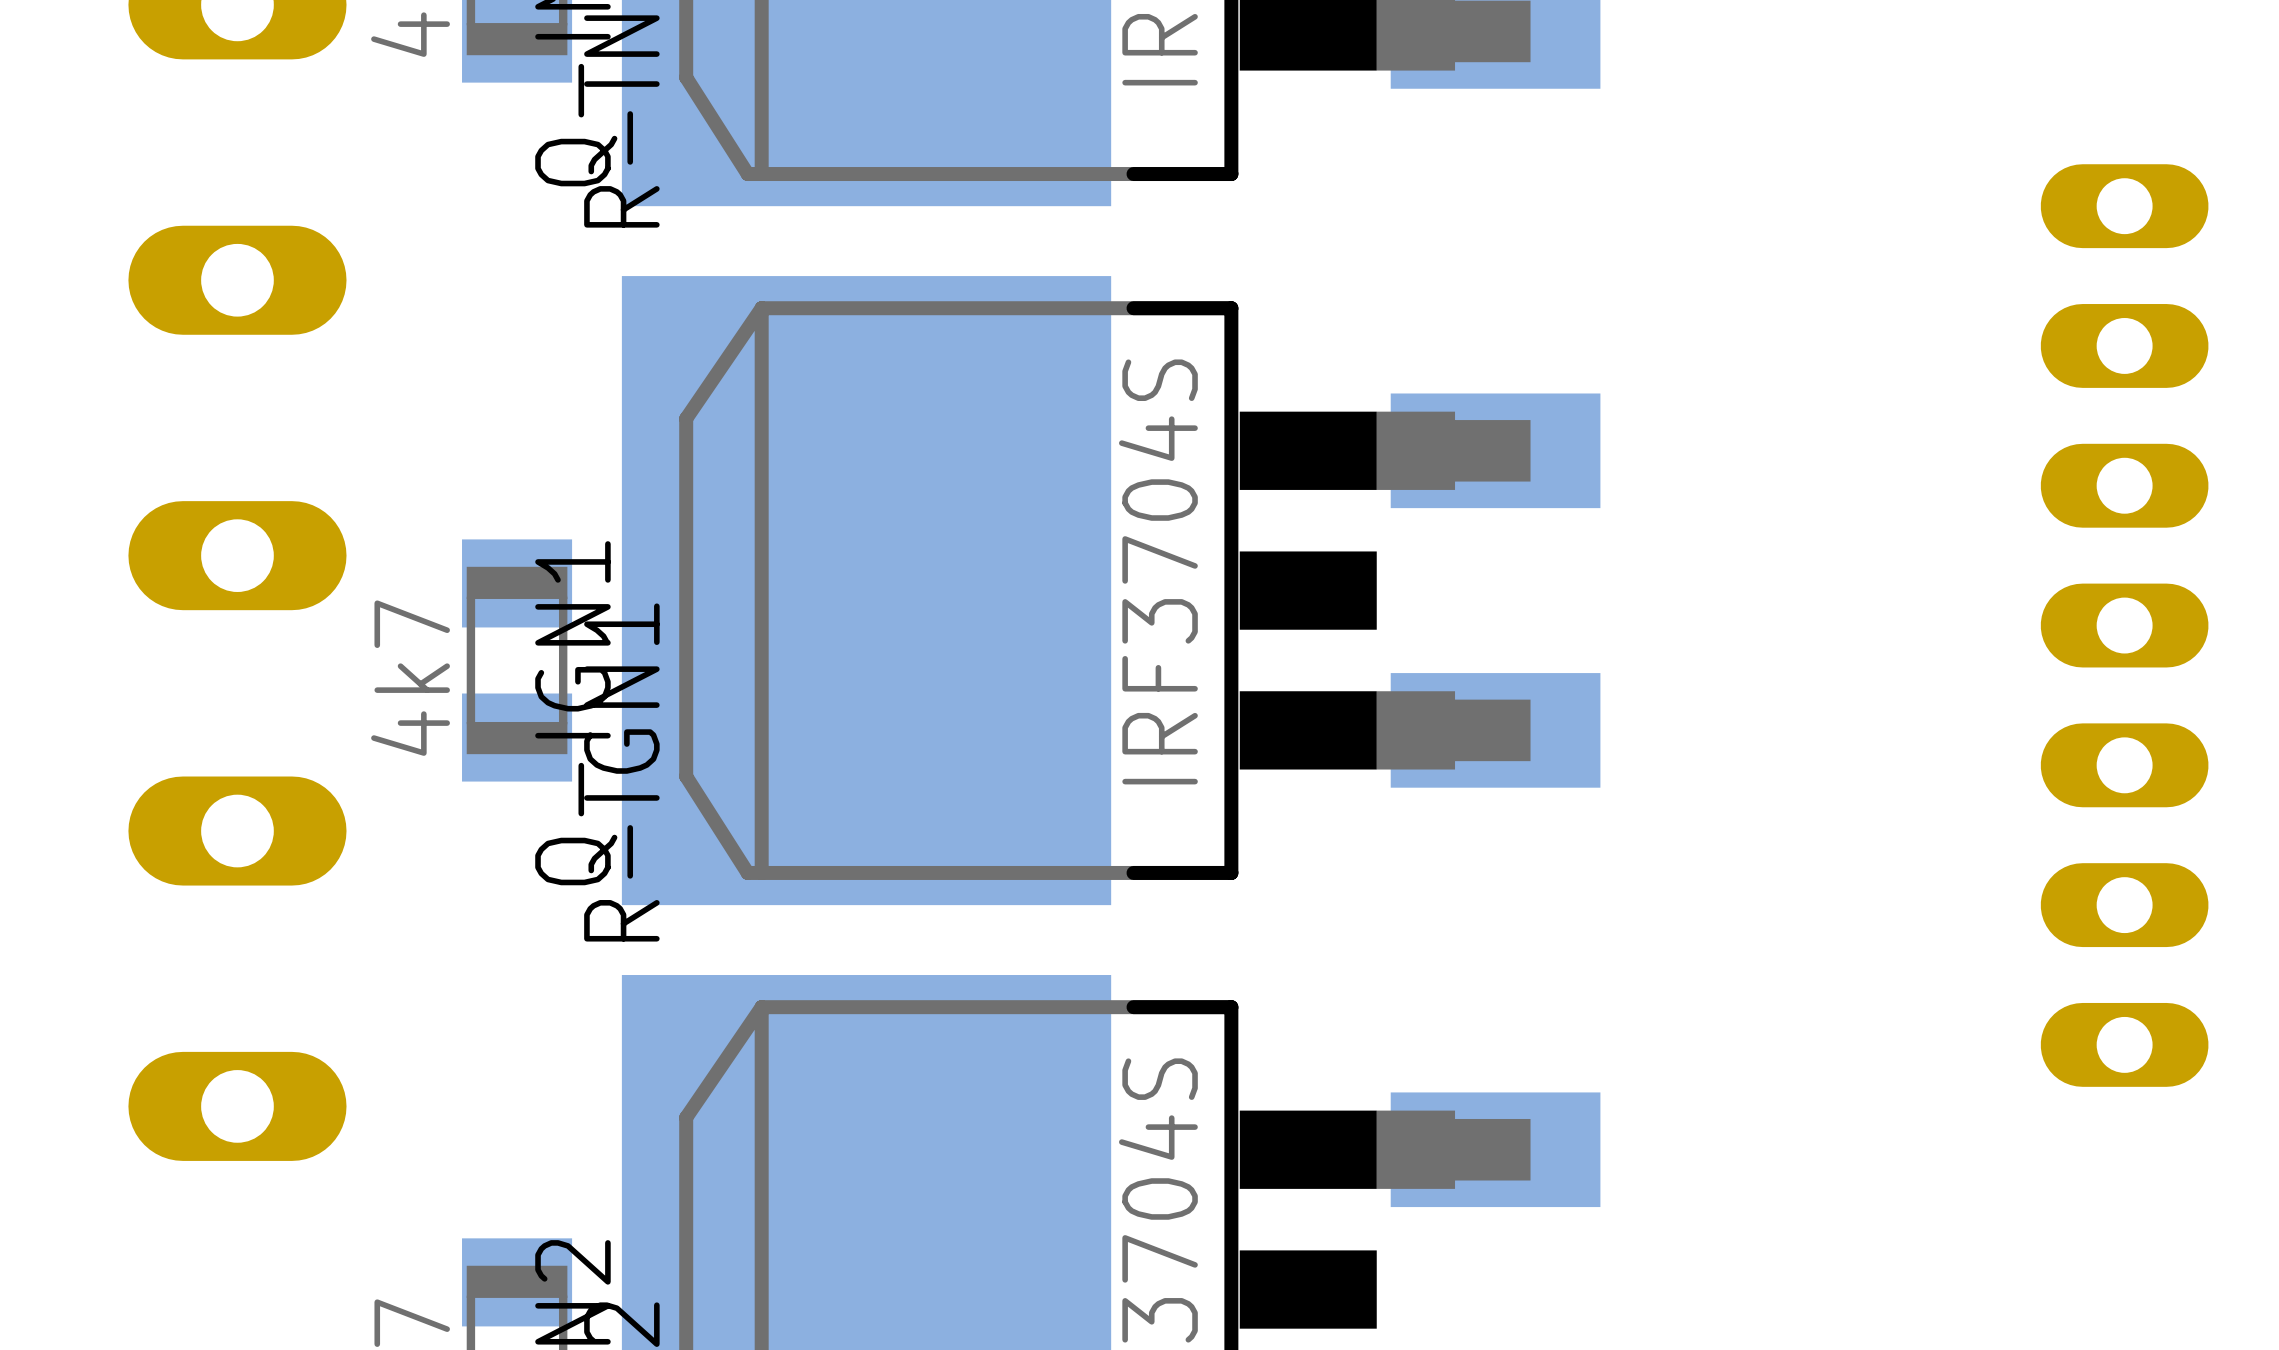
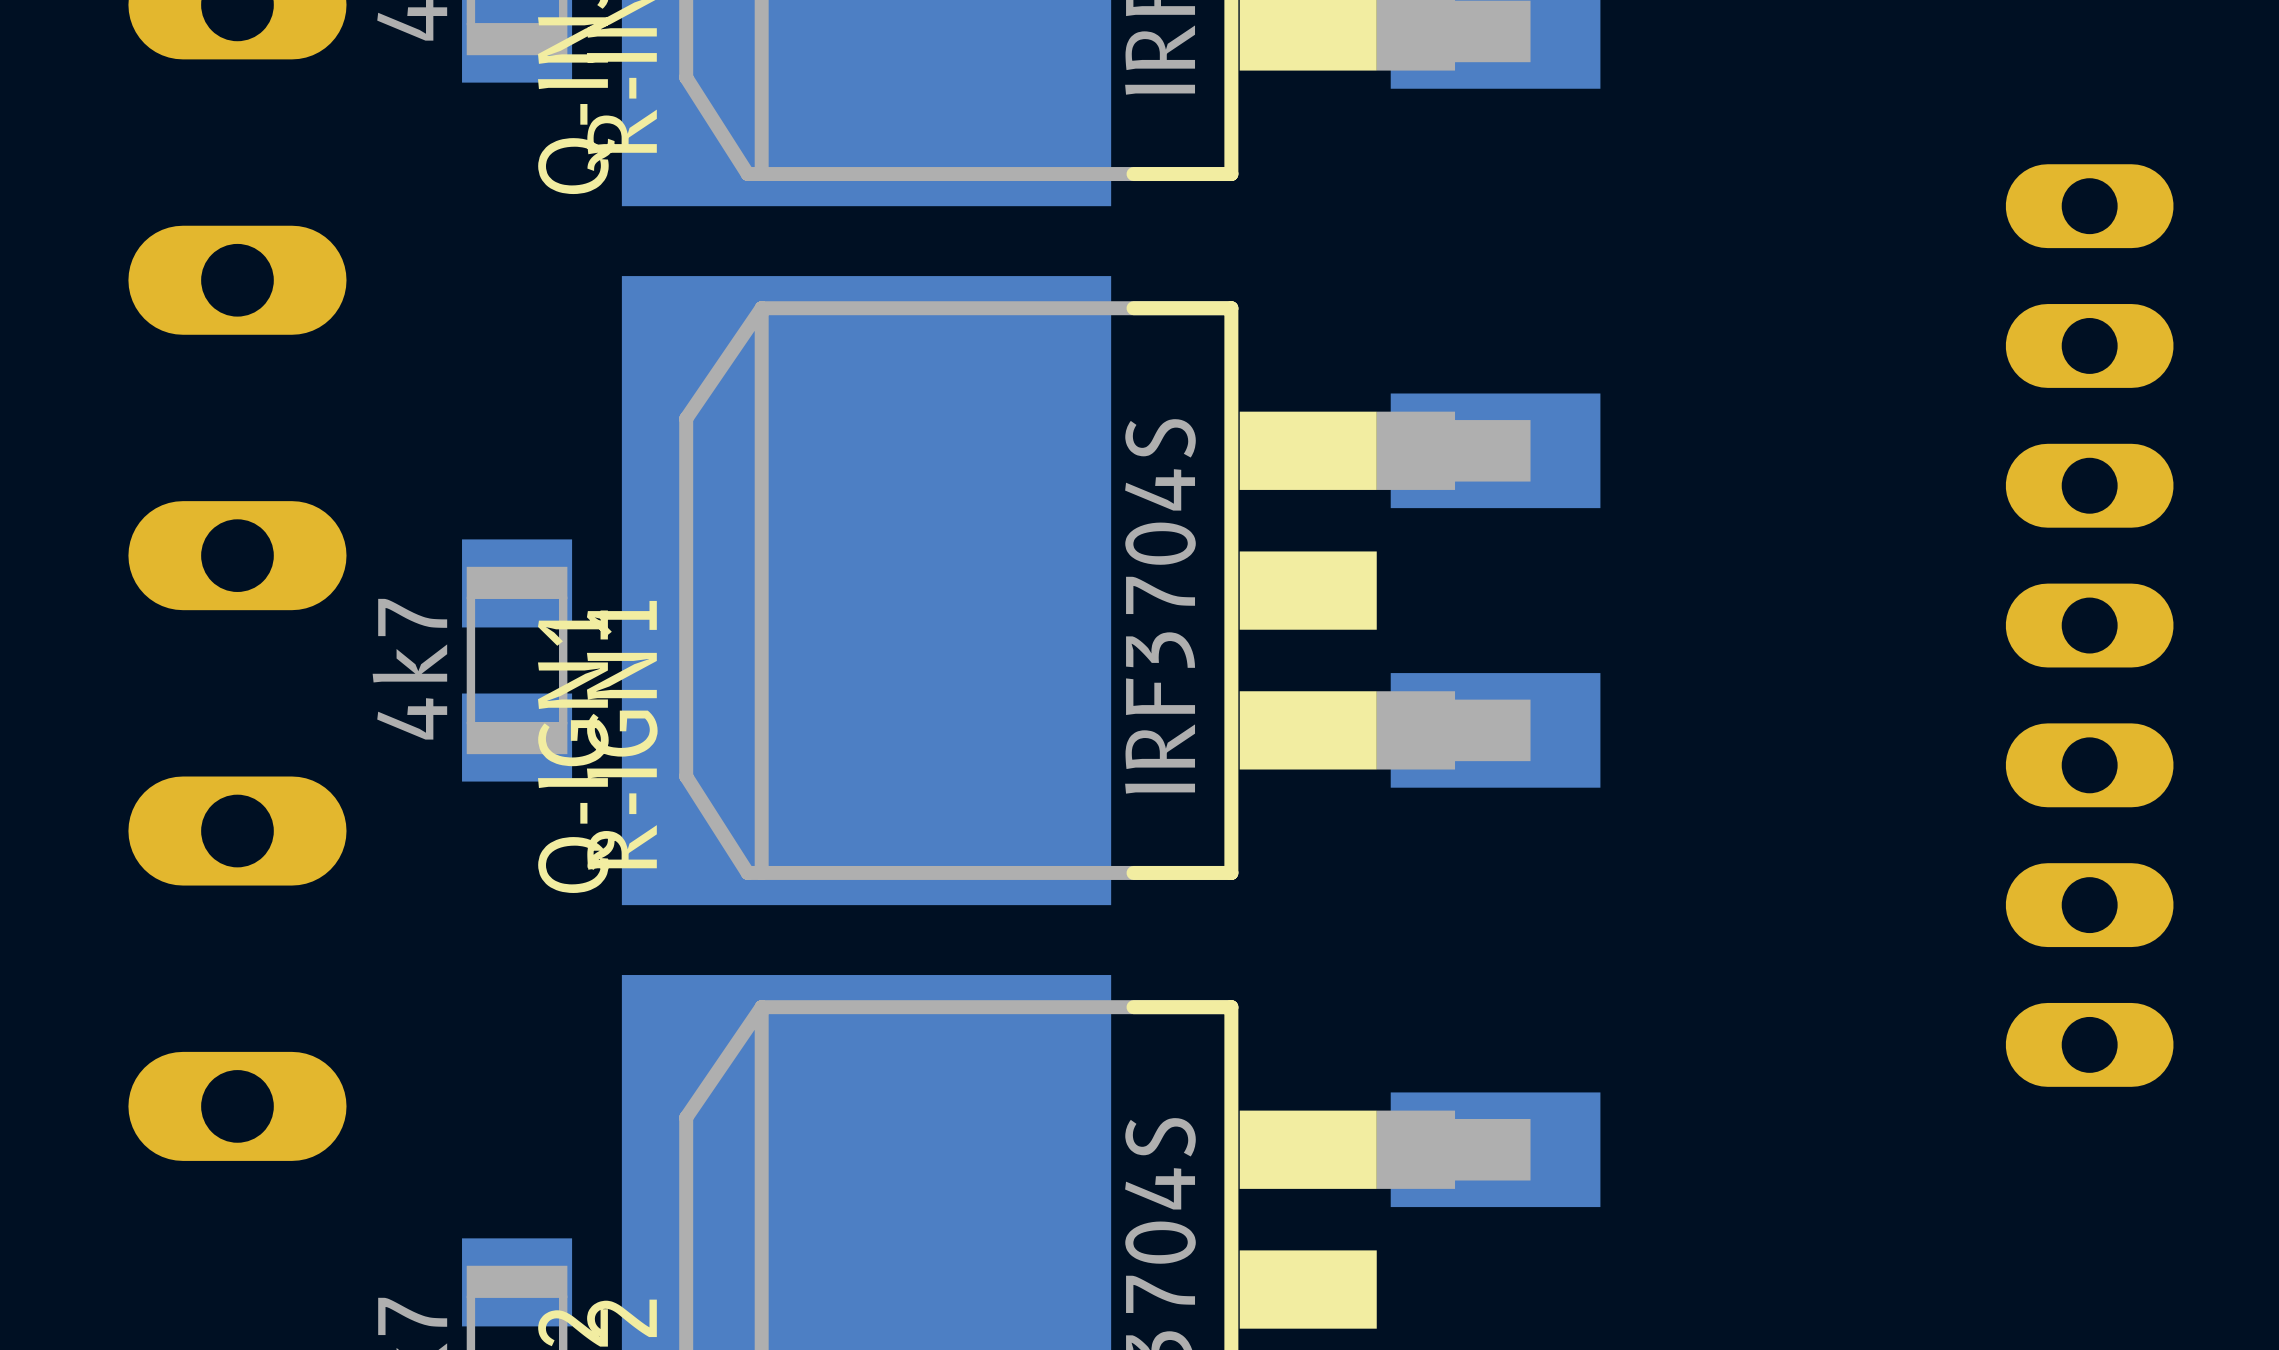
part position: (2124, 625) -> (2089, 625)

